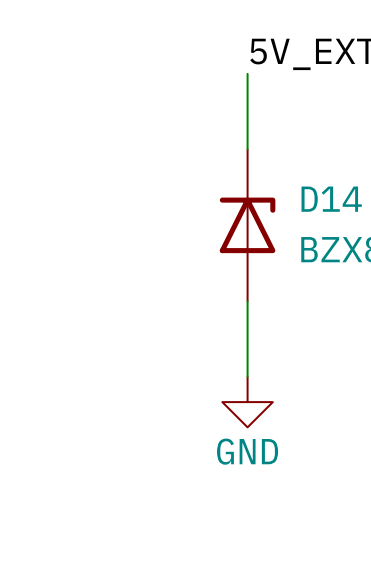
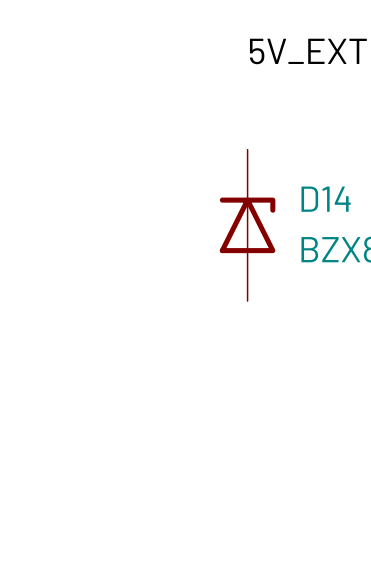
wire: (247, 73) (247, 149) -> none
wire: (247, 301) (247, 376) -> none
power symbol: GND (247, 402) -> none

